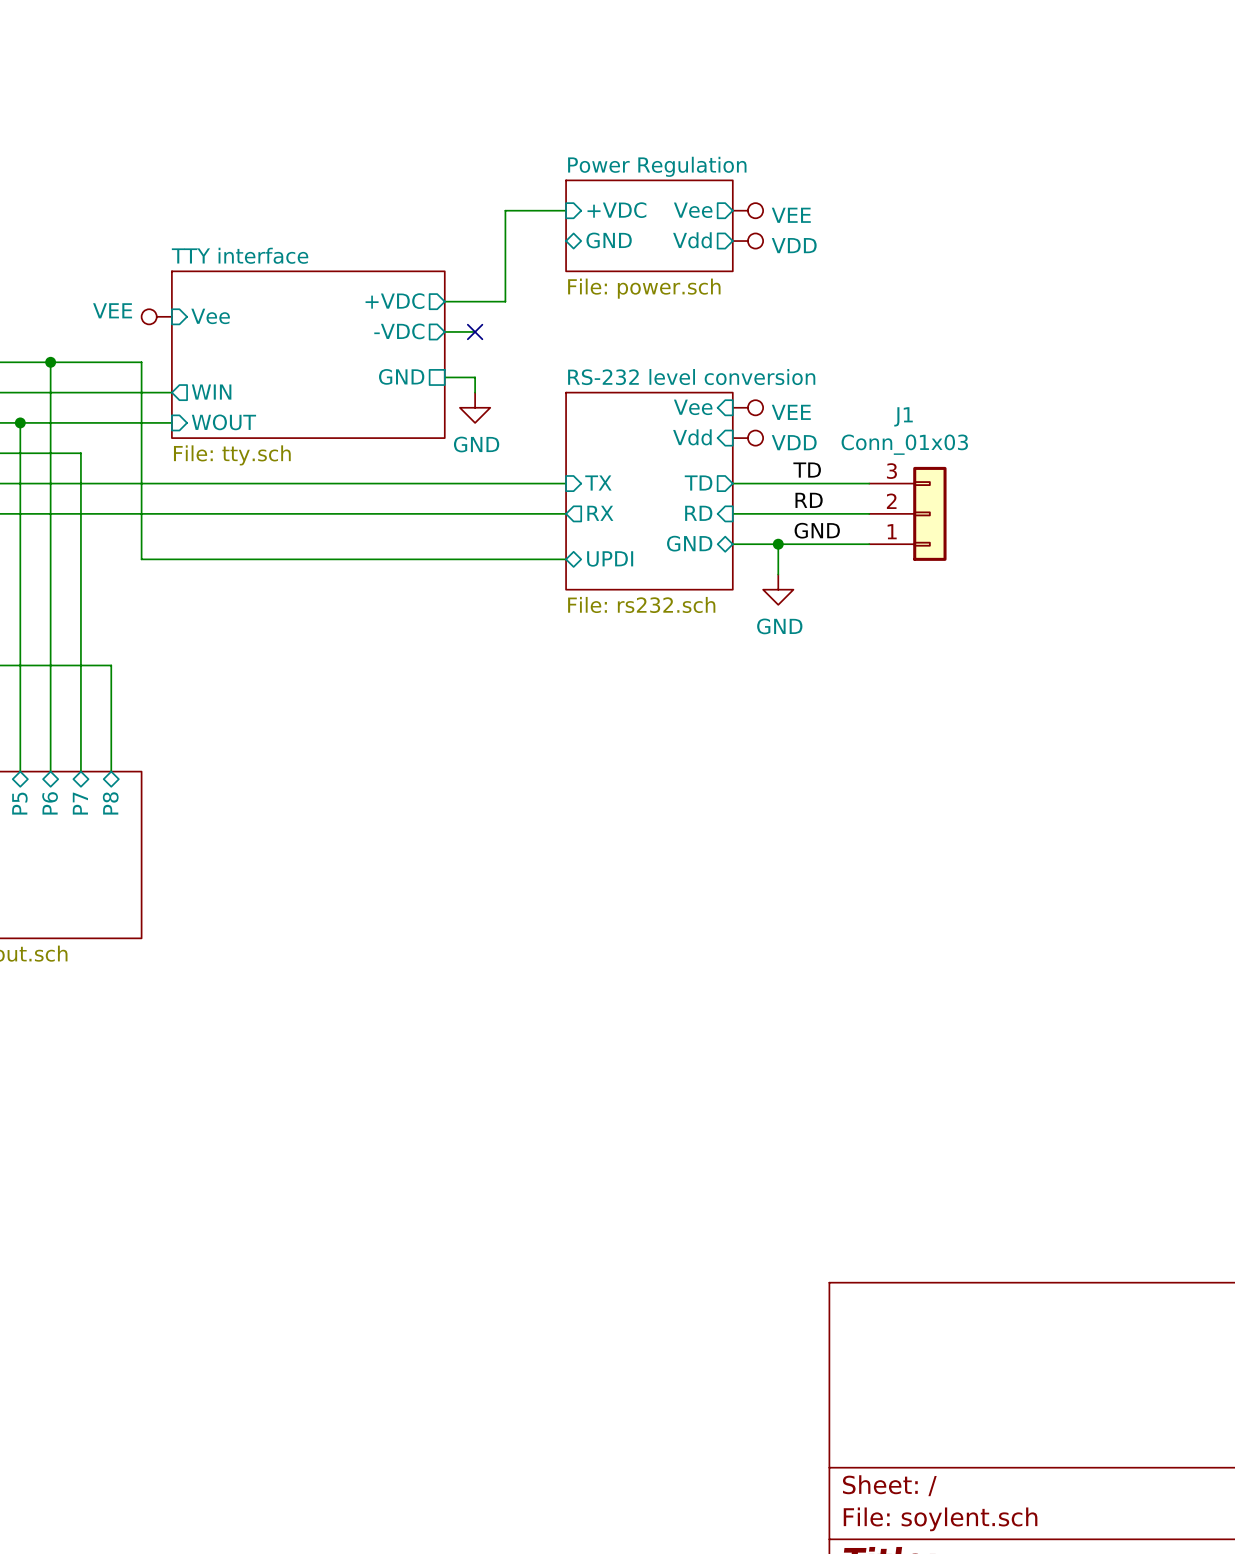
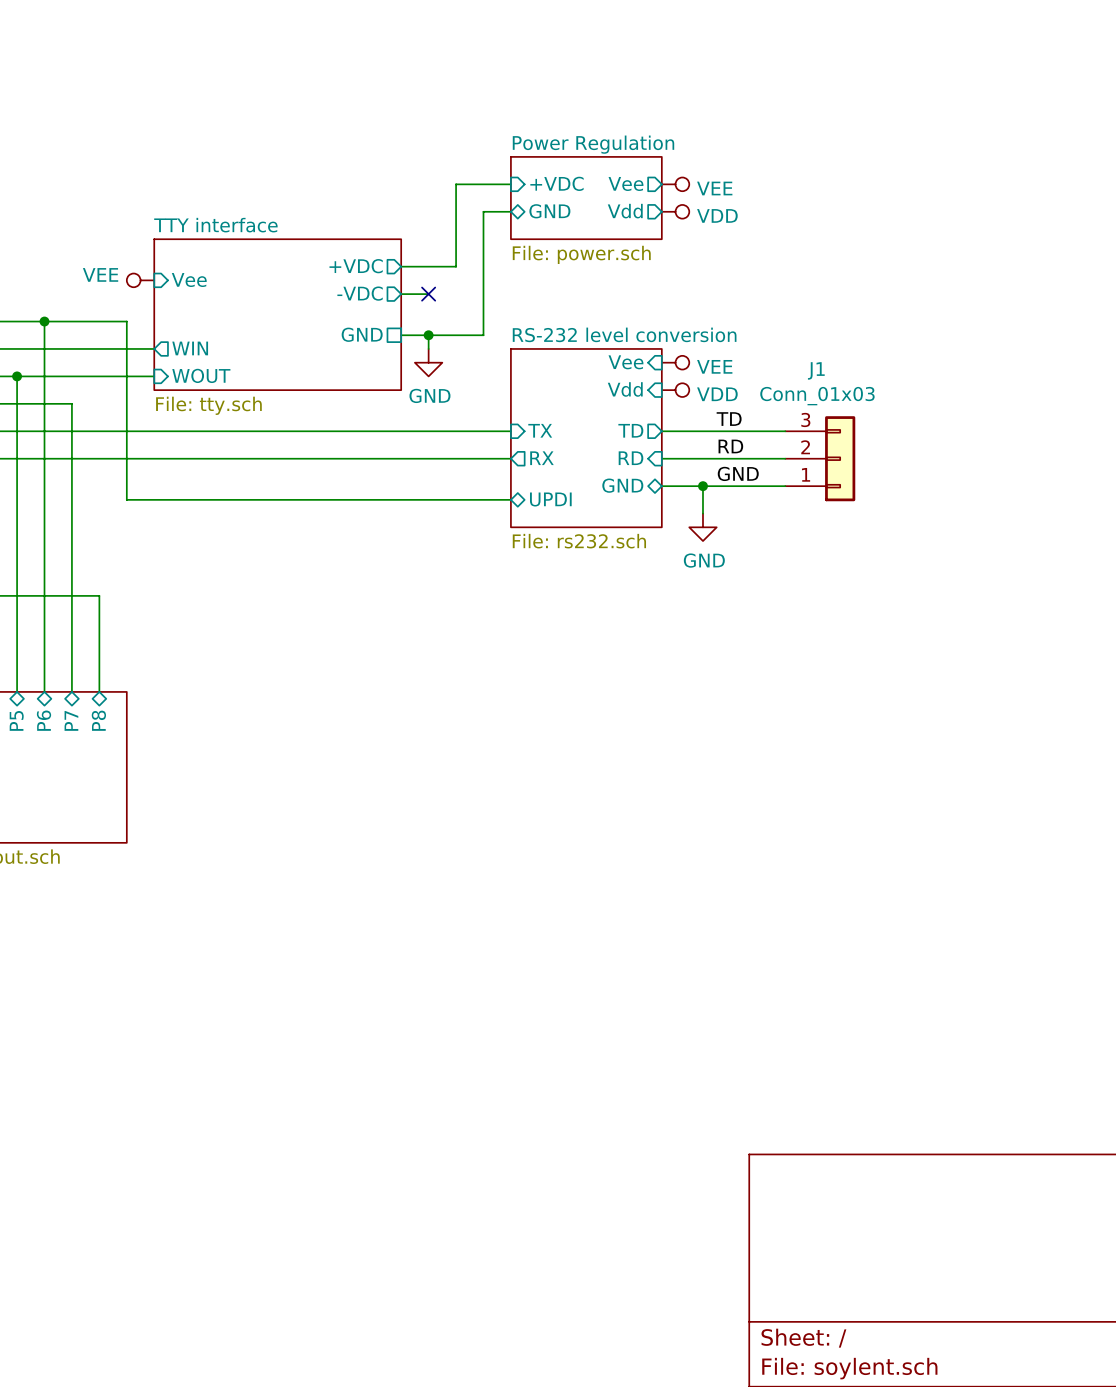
wire: none -> (510, 211) (483, 211) (483, 335) (428, 335)
junction: none -> (428, 335)

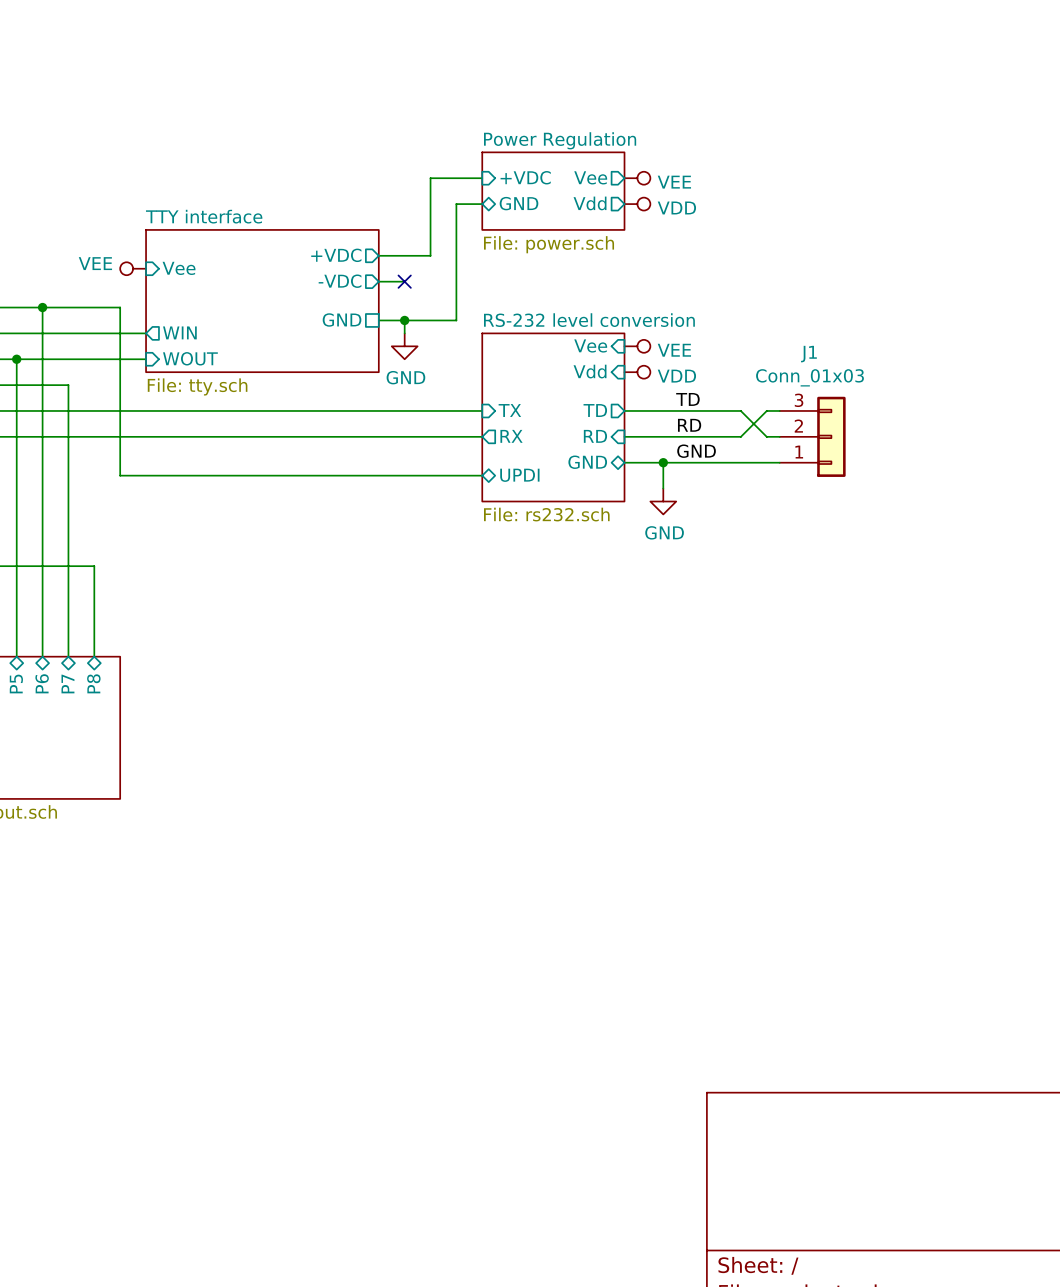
wire: none -> (740, 410) (766, 436) (779, 436)
wire: none -> (779, 410) (766, 410) (740, 436)
J1 position: (820, 458) -> (812, 436)

